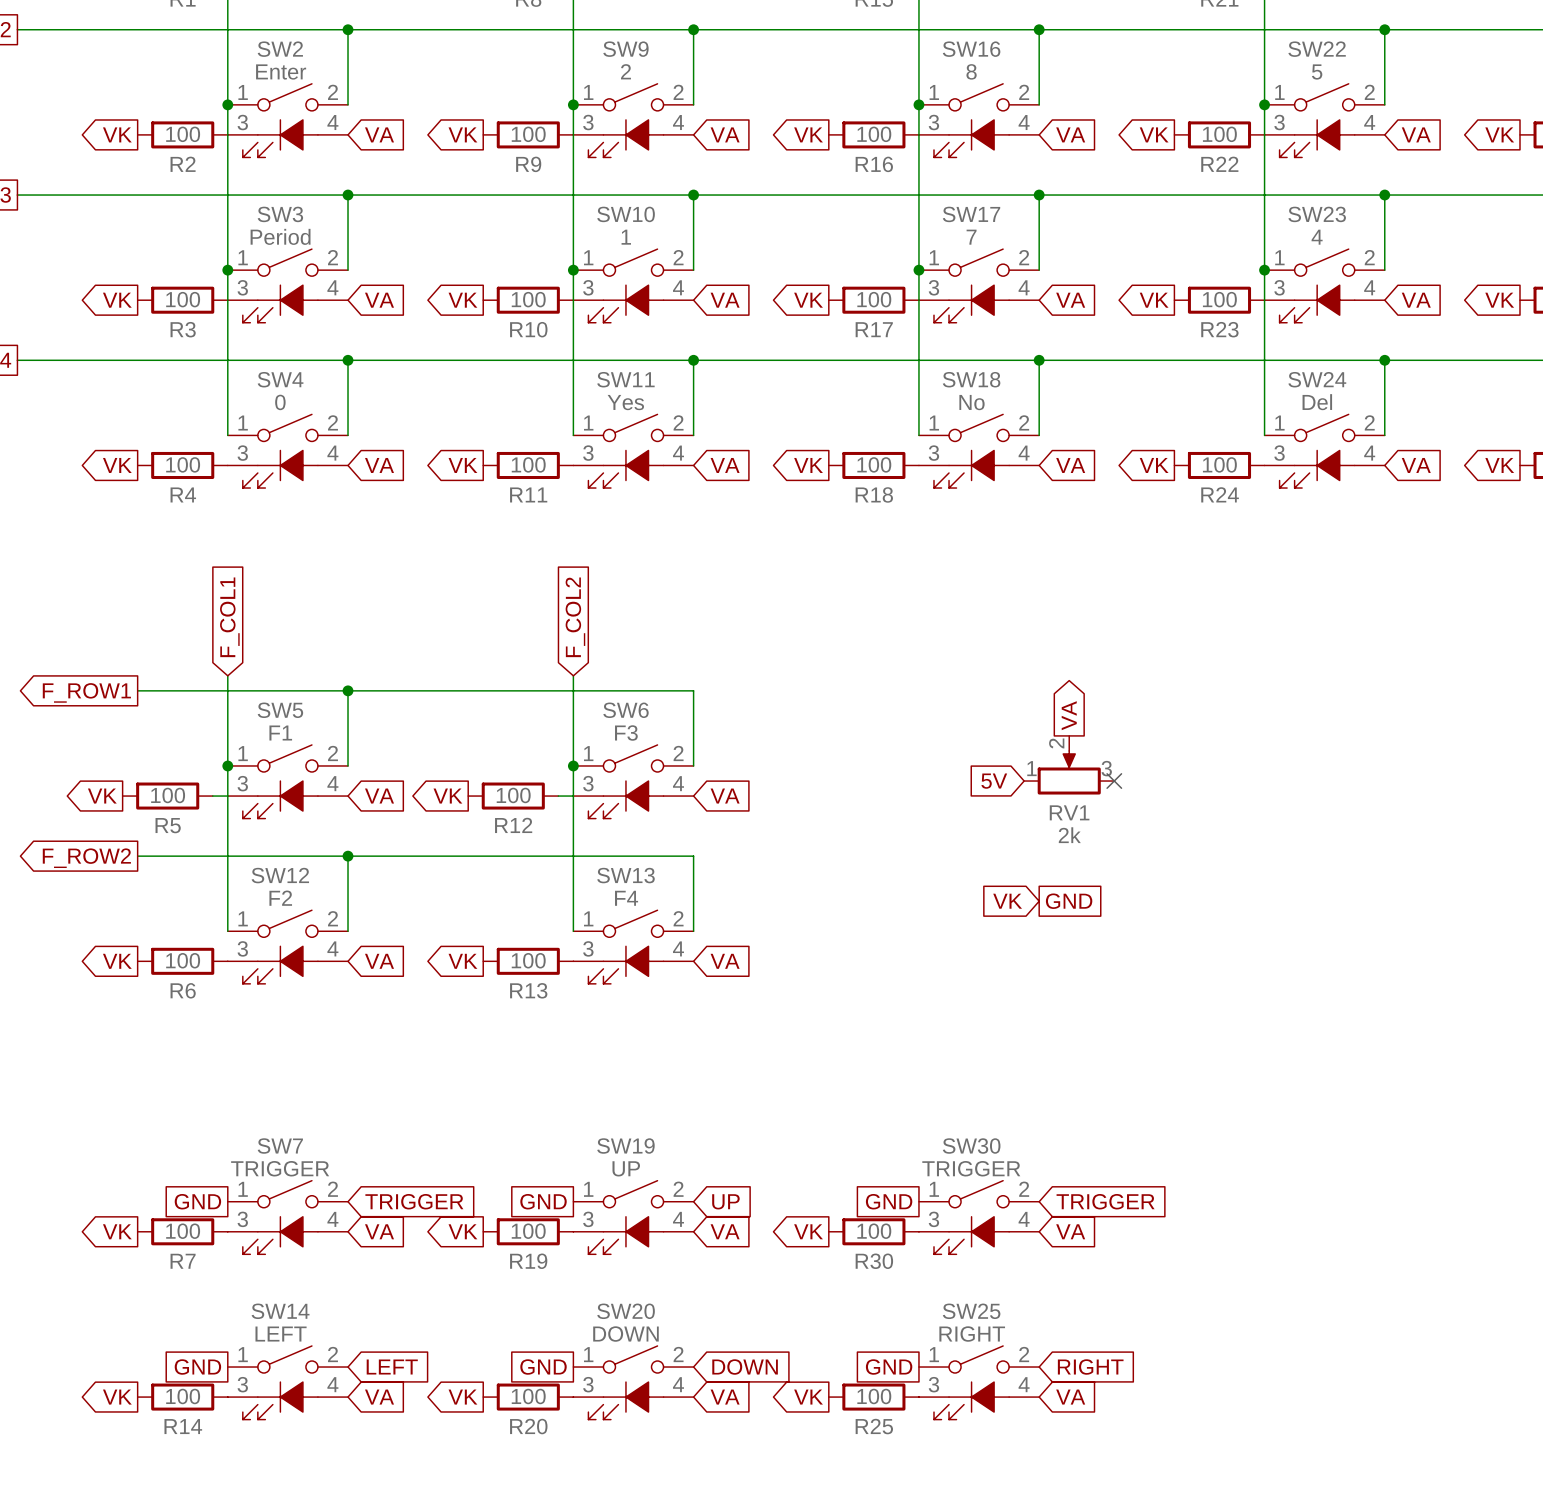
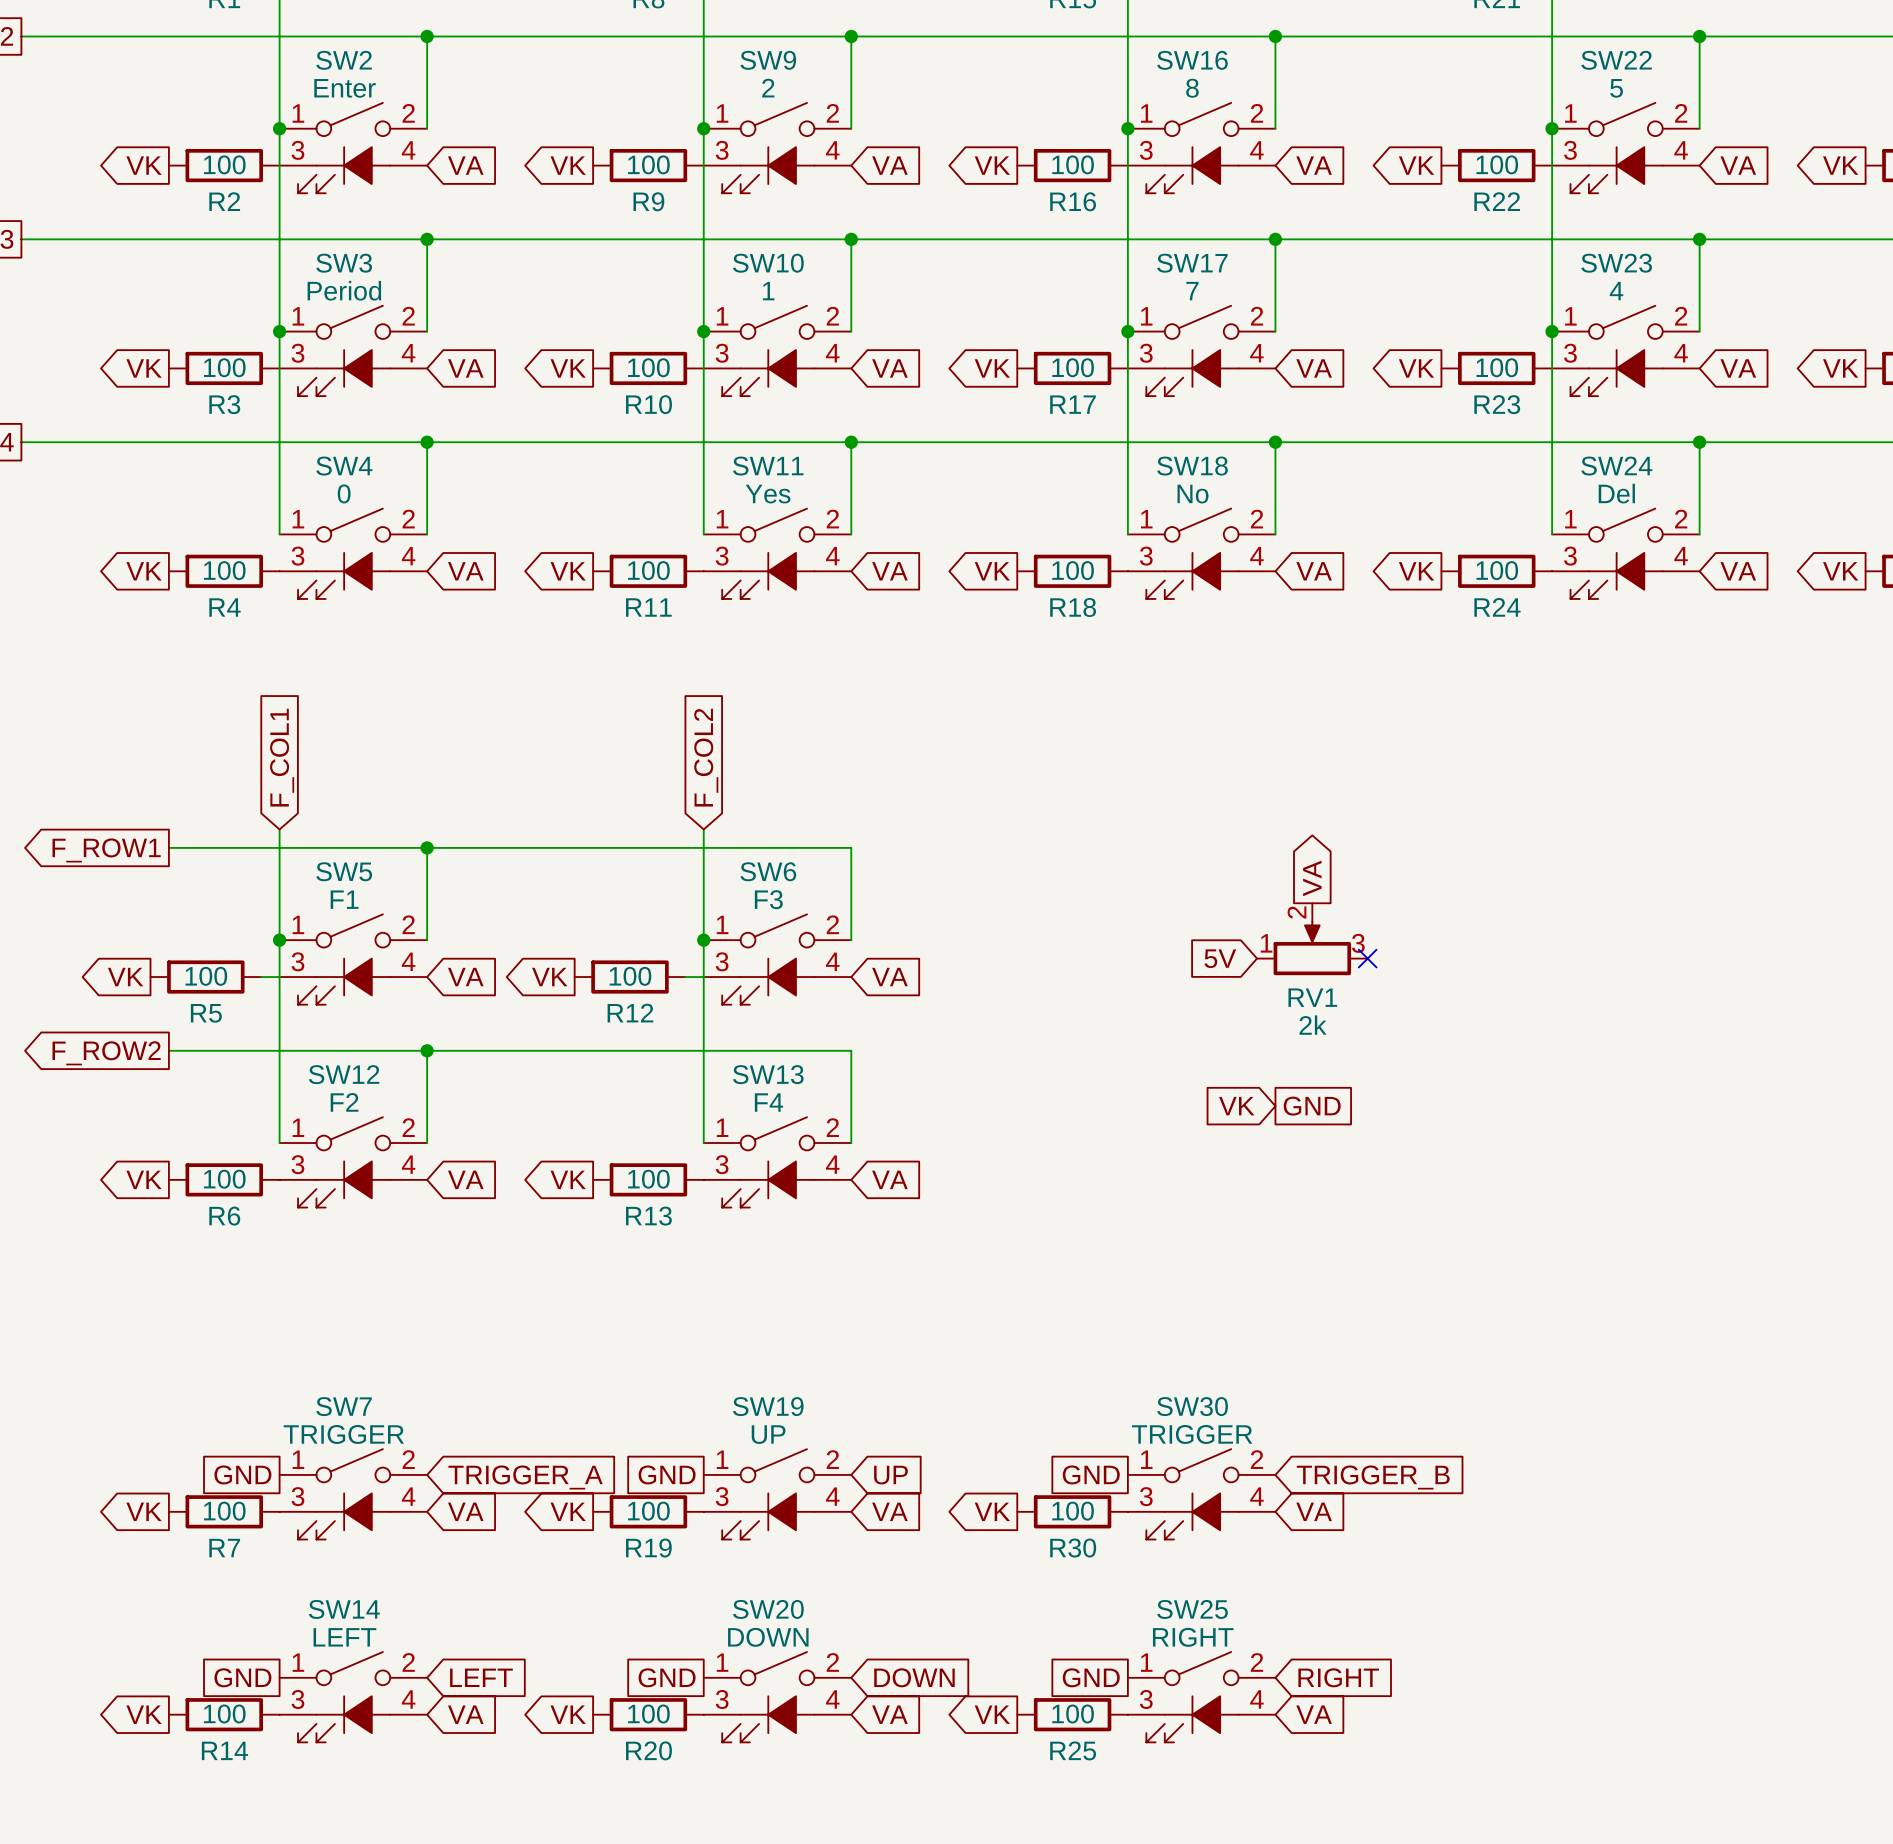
global label: TRIGGER (414, 1201) -> TRIGGER_A (525, 1477)
global label: TRIGGER (1105, 1201) -> TRIGGER_B (1373, 1477)

